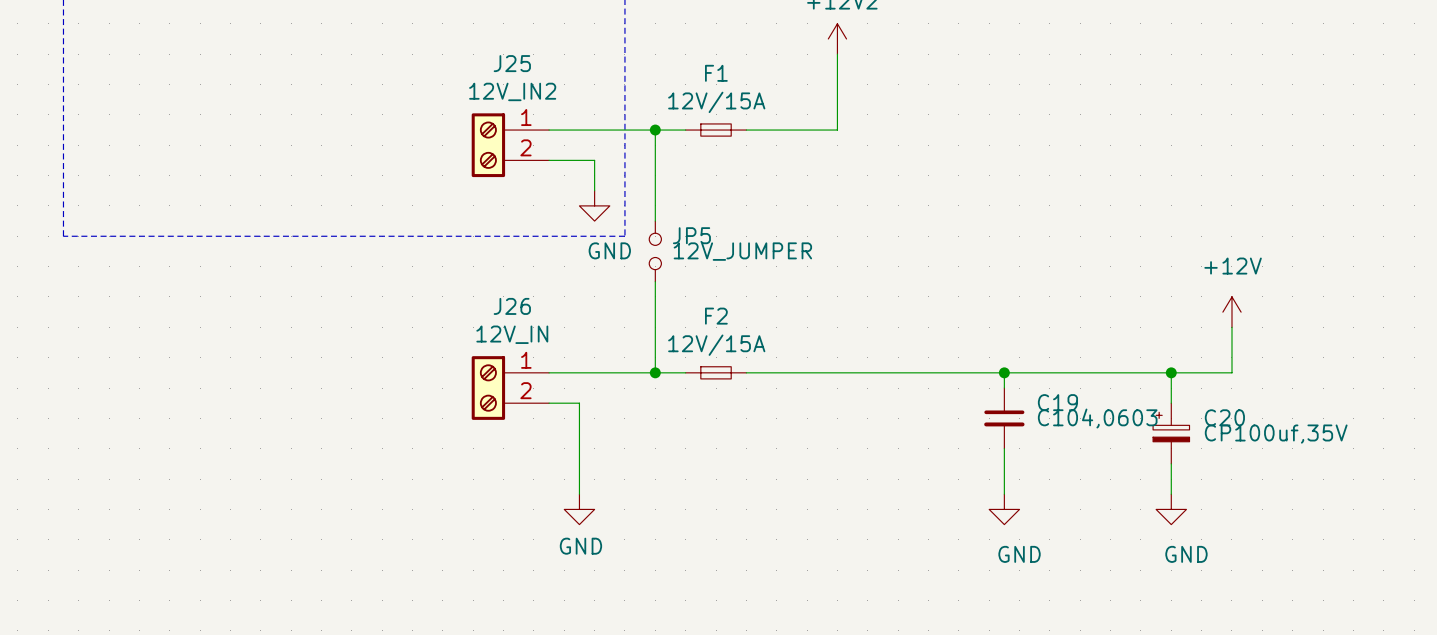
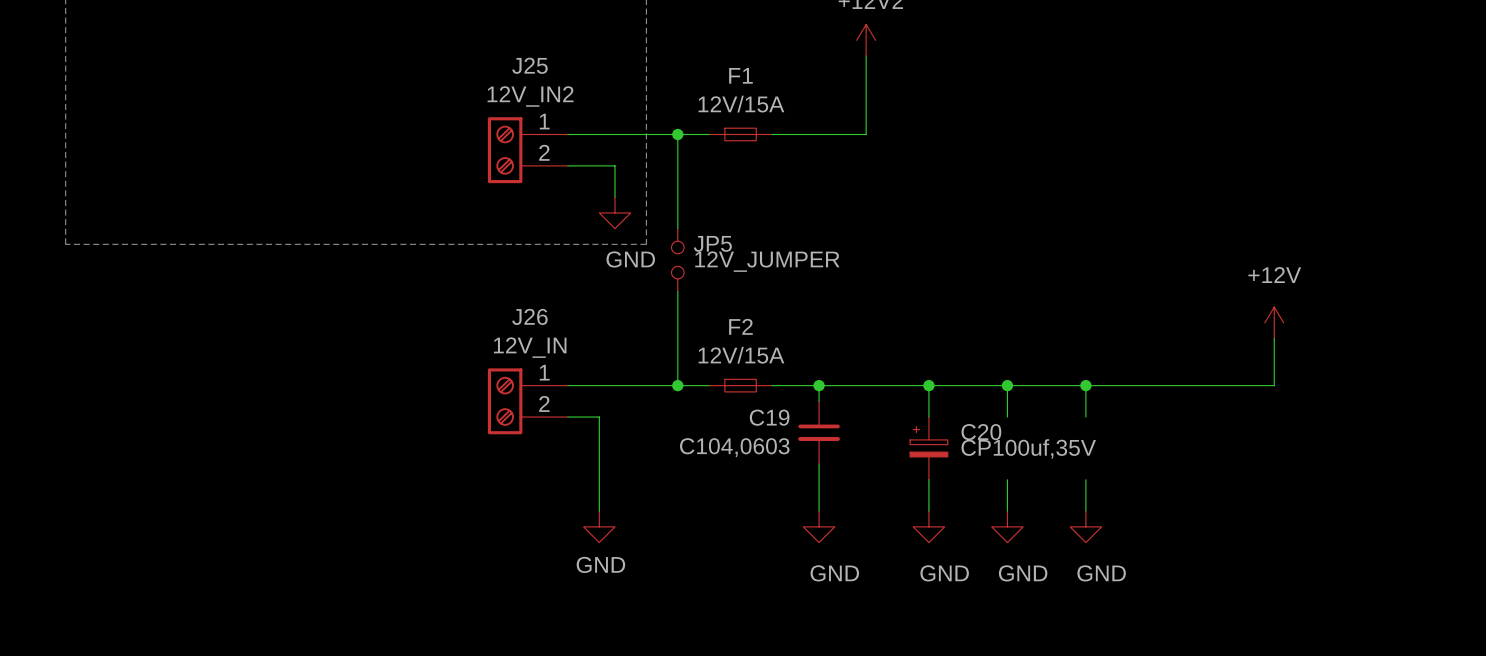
junction: none -> (819, 385)
wire: none -> (928, 385) (928, 417)
junction: none -> (928, 385)
wire: none -> (1007, 385) (1007, 417)
junction: none -> (1007, 385)
wire: (1004, 372) (1004, 388) -> (819, 385) (819, 401)
junction: (1004, 372) -> none
junction: none -> (1085, 385)
wire: (1171, 372) (1171, 403) -> (1085, 385) (1085, 417)
junction: (1171, 372) -> none
C19 name position: C19 (1057, 402) -> C19 (769, 417)
C19 position: (1004, 418) -> (819, 432)
C19 value position: C104,0603 (1097, 418) -> C104,0603 (734, 447)
C20 position: (1171, 433) -> (928, 448)
wire: (1004, 448) (1004, 494) -> (819, 464) (819, 511)
wire: none -> (928, 479) (928, 511)
wire: none -> (1007, 479) (1007, 511)
wire: (1171, 463) (1171, 494) -> (1085, 479) (1085, 511)
power symbol: none -> GND (819, 526)
power symbol: none -> GND (928, 526)
power symbol: none -> GND (1007, 526)
power symbol: GND (1004, 509) -> none
power symbol: none -> GND (1085, 526)
power symbol: GND (1171, 509) -> none

